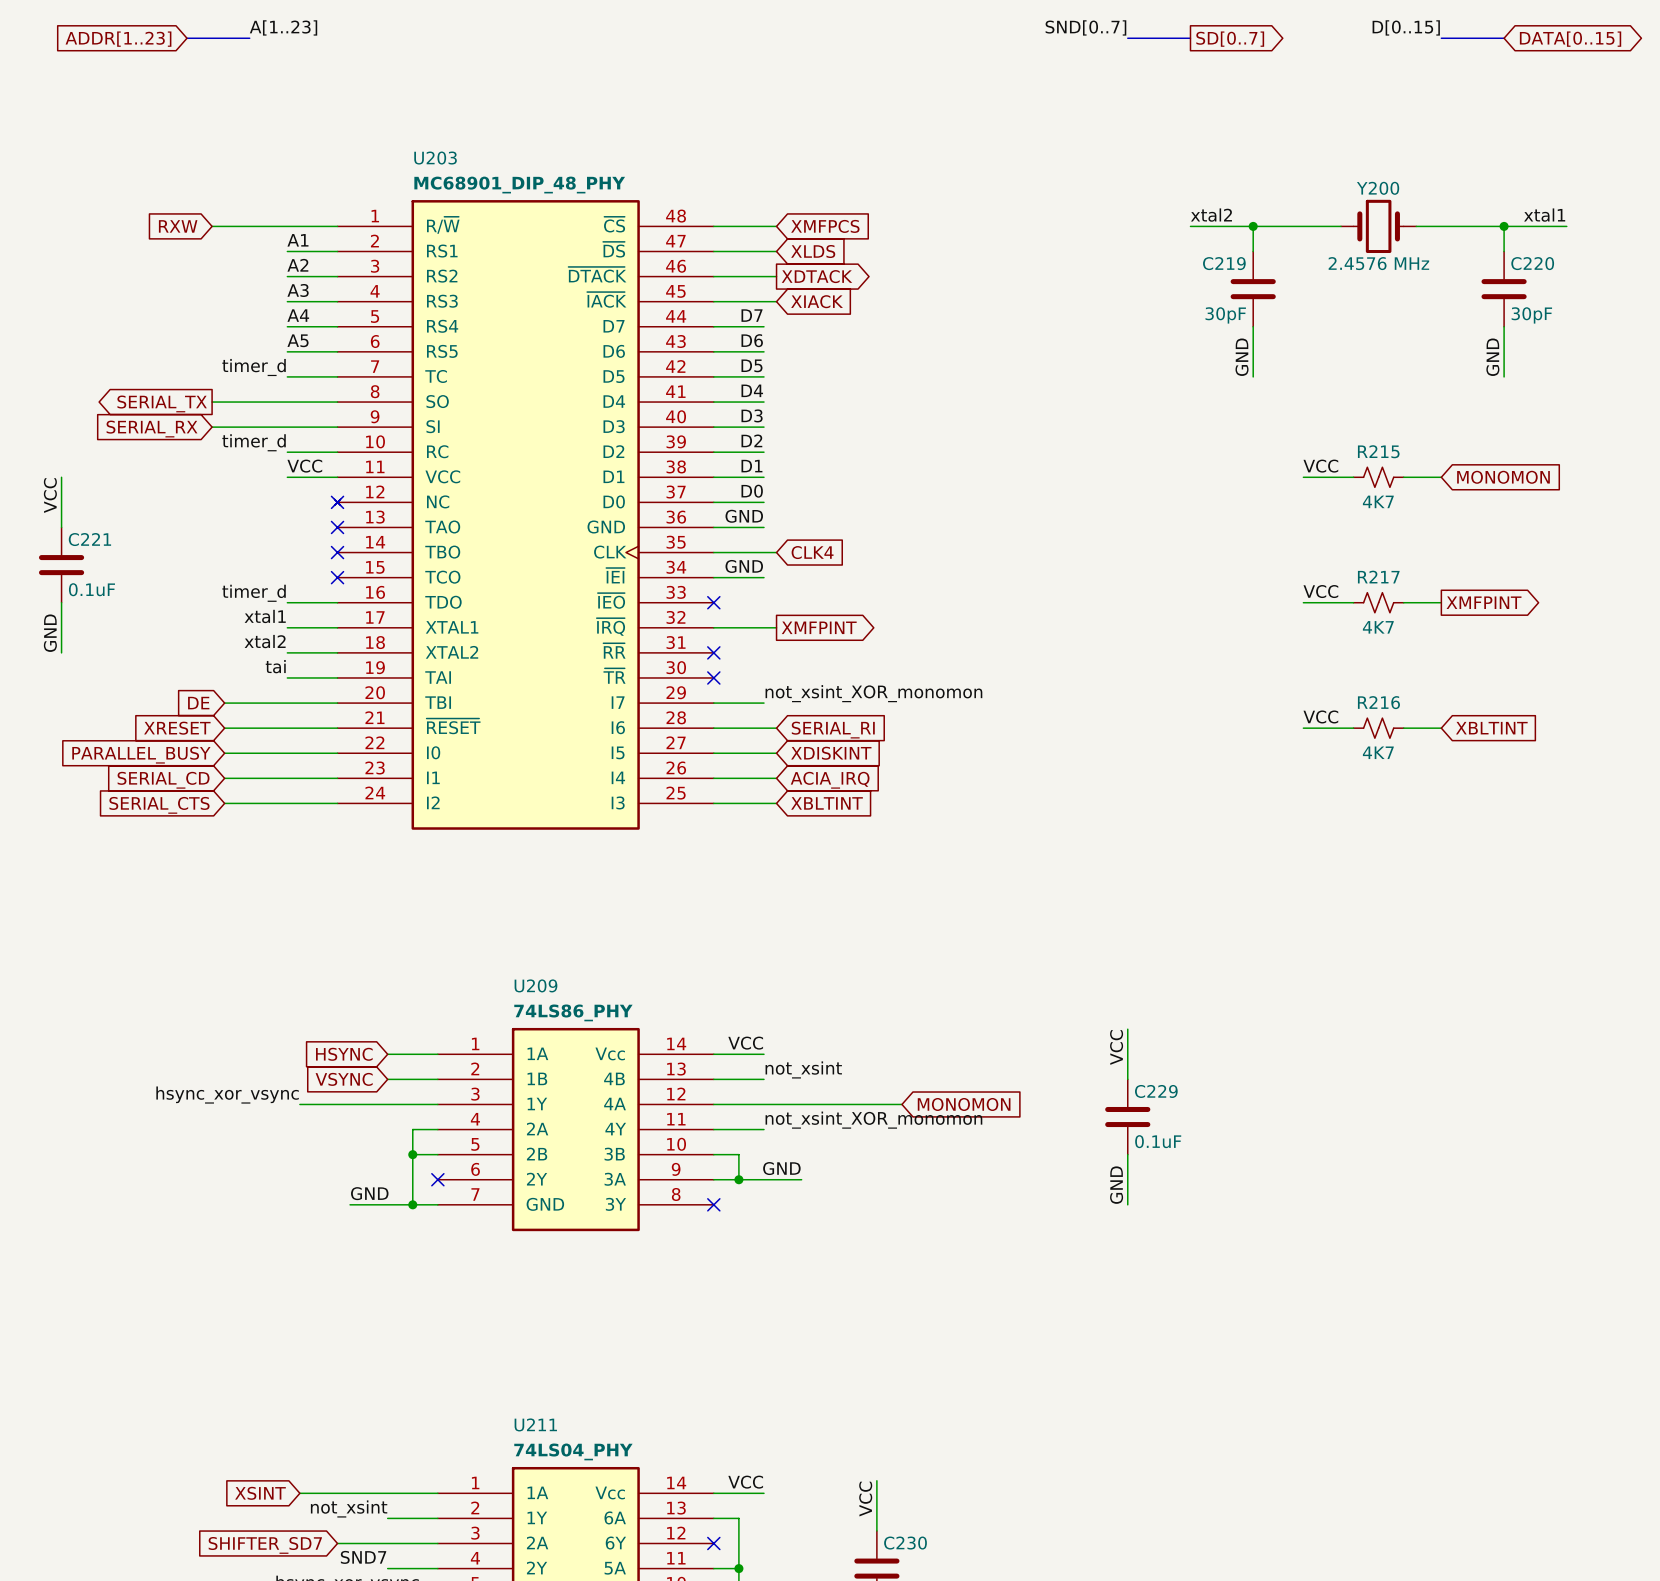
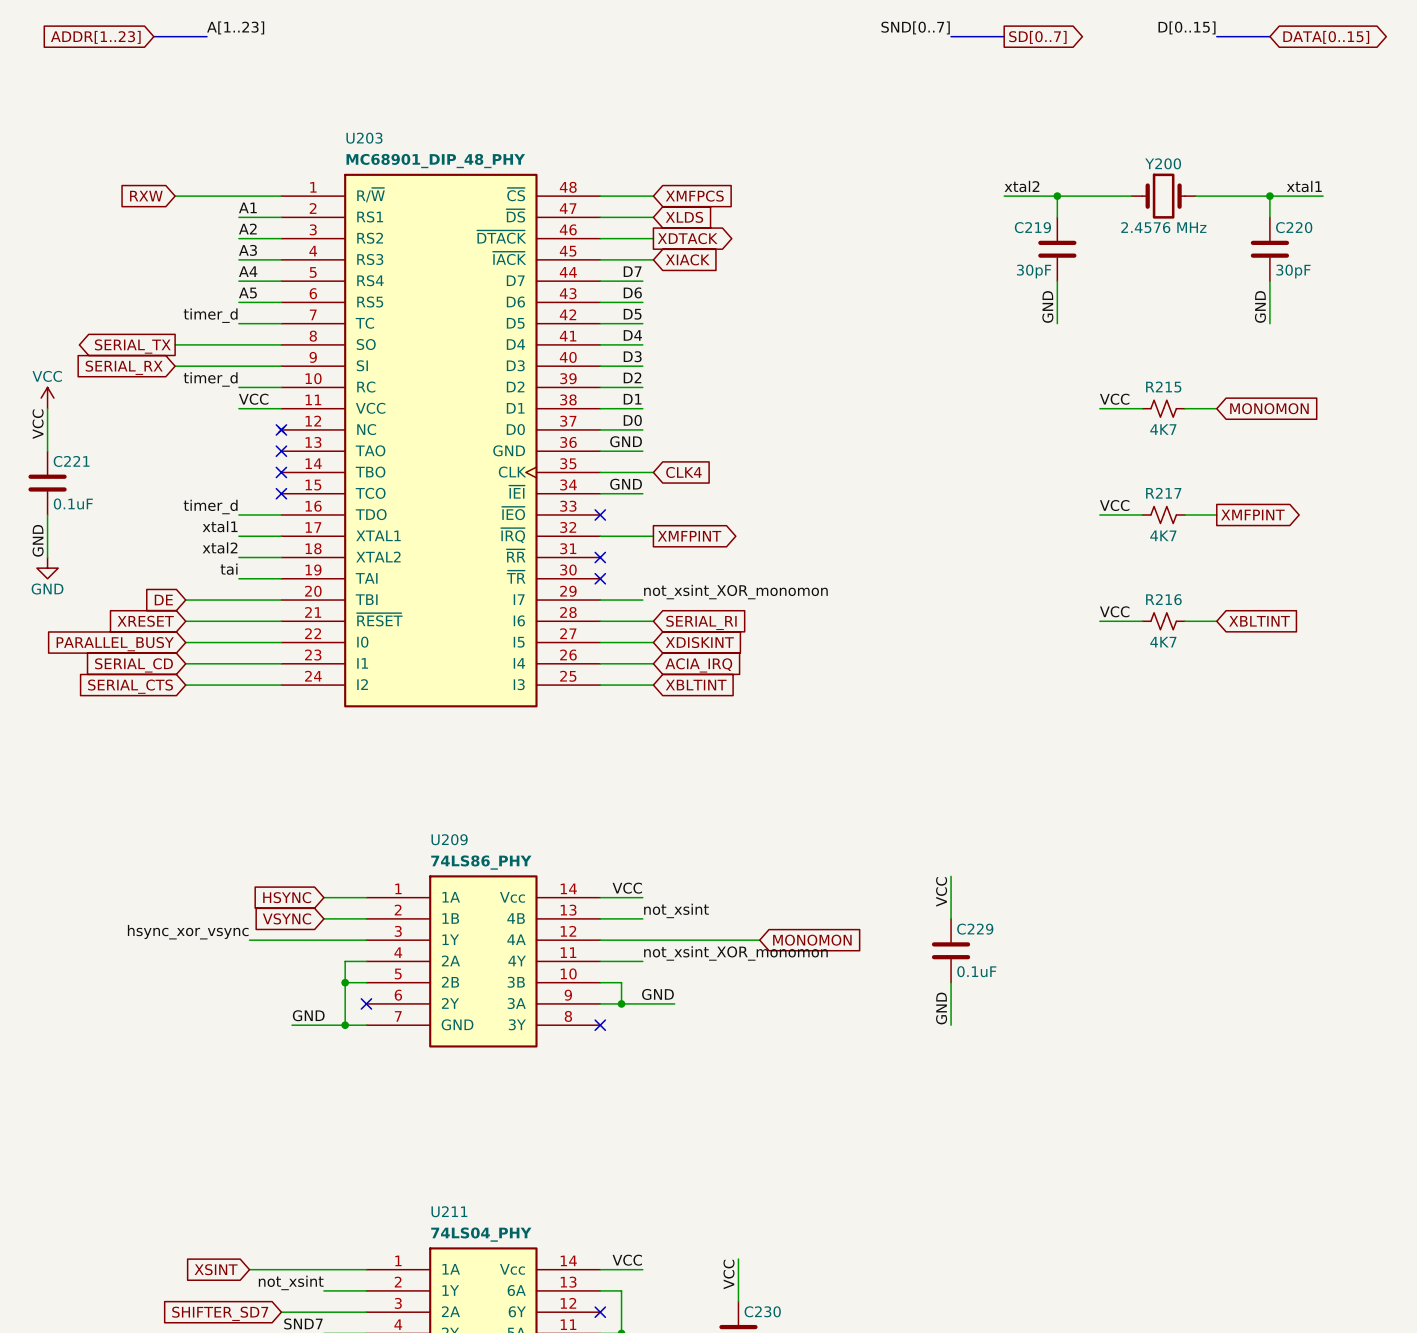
power symbol: none -> VCC (47, 398)
power symbol: none -> GND (47, 568)

